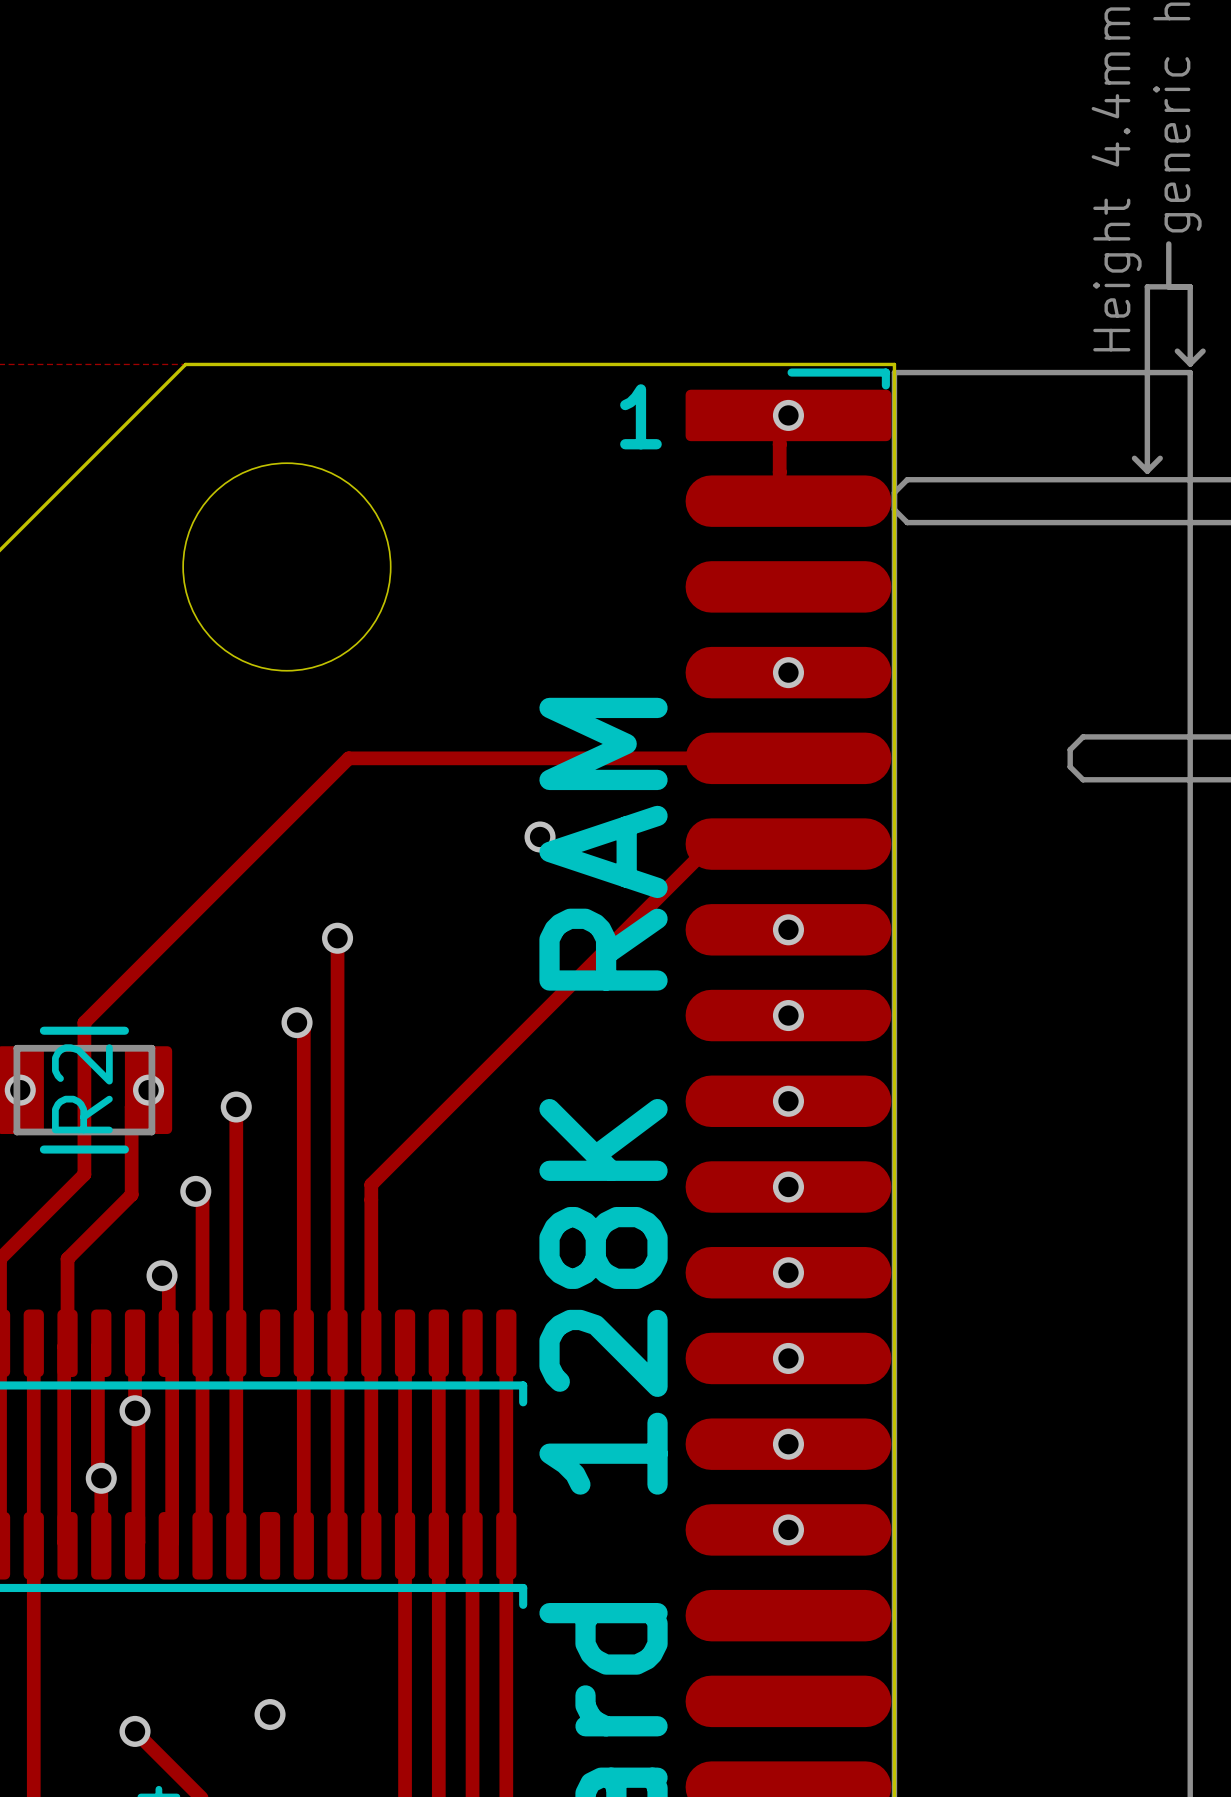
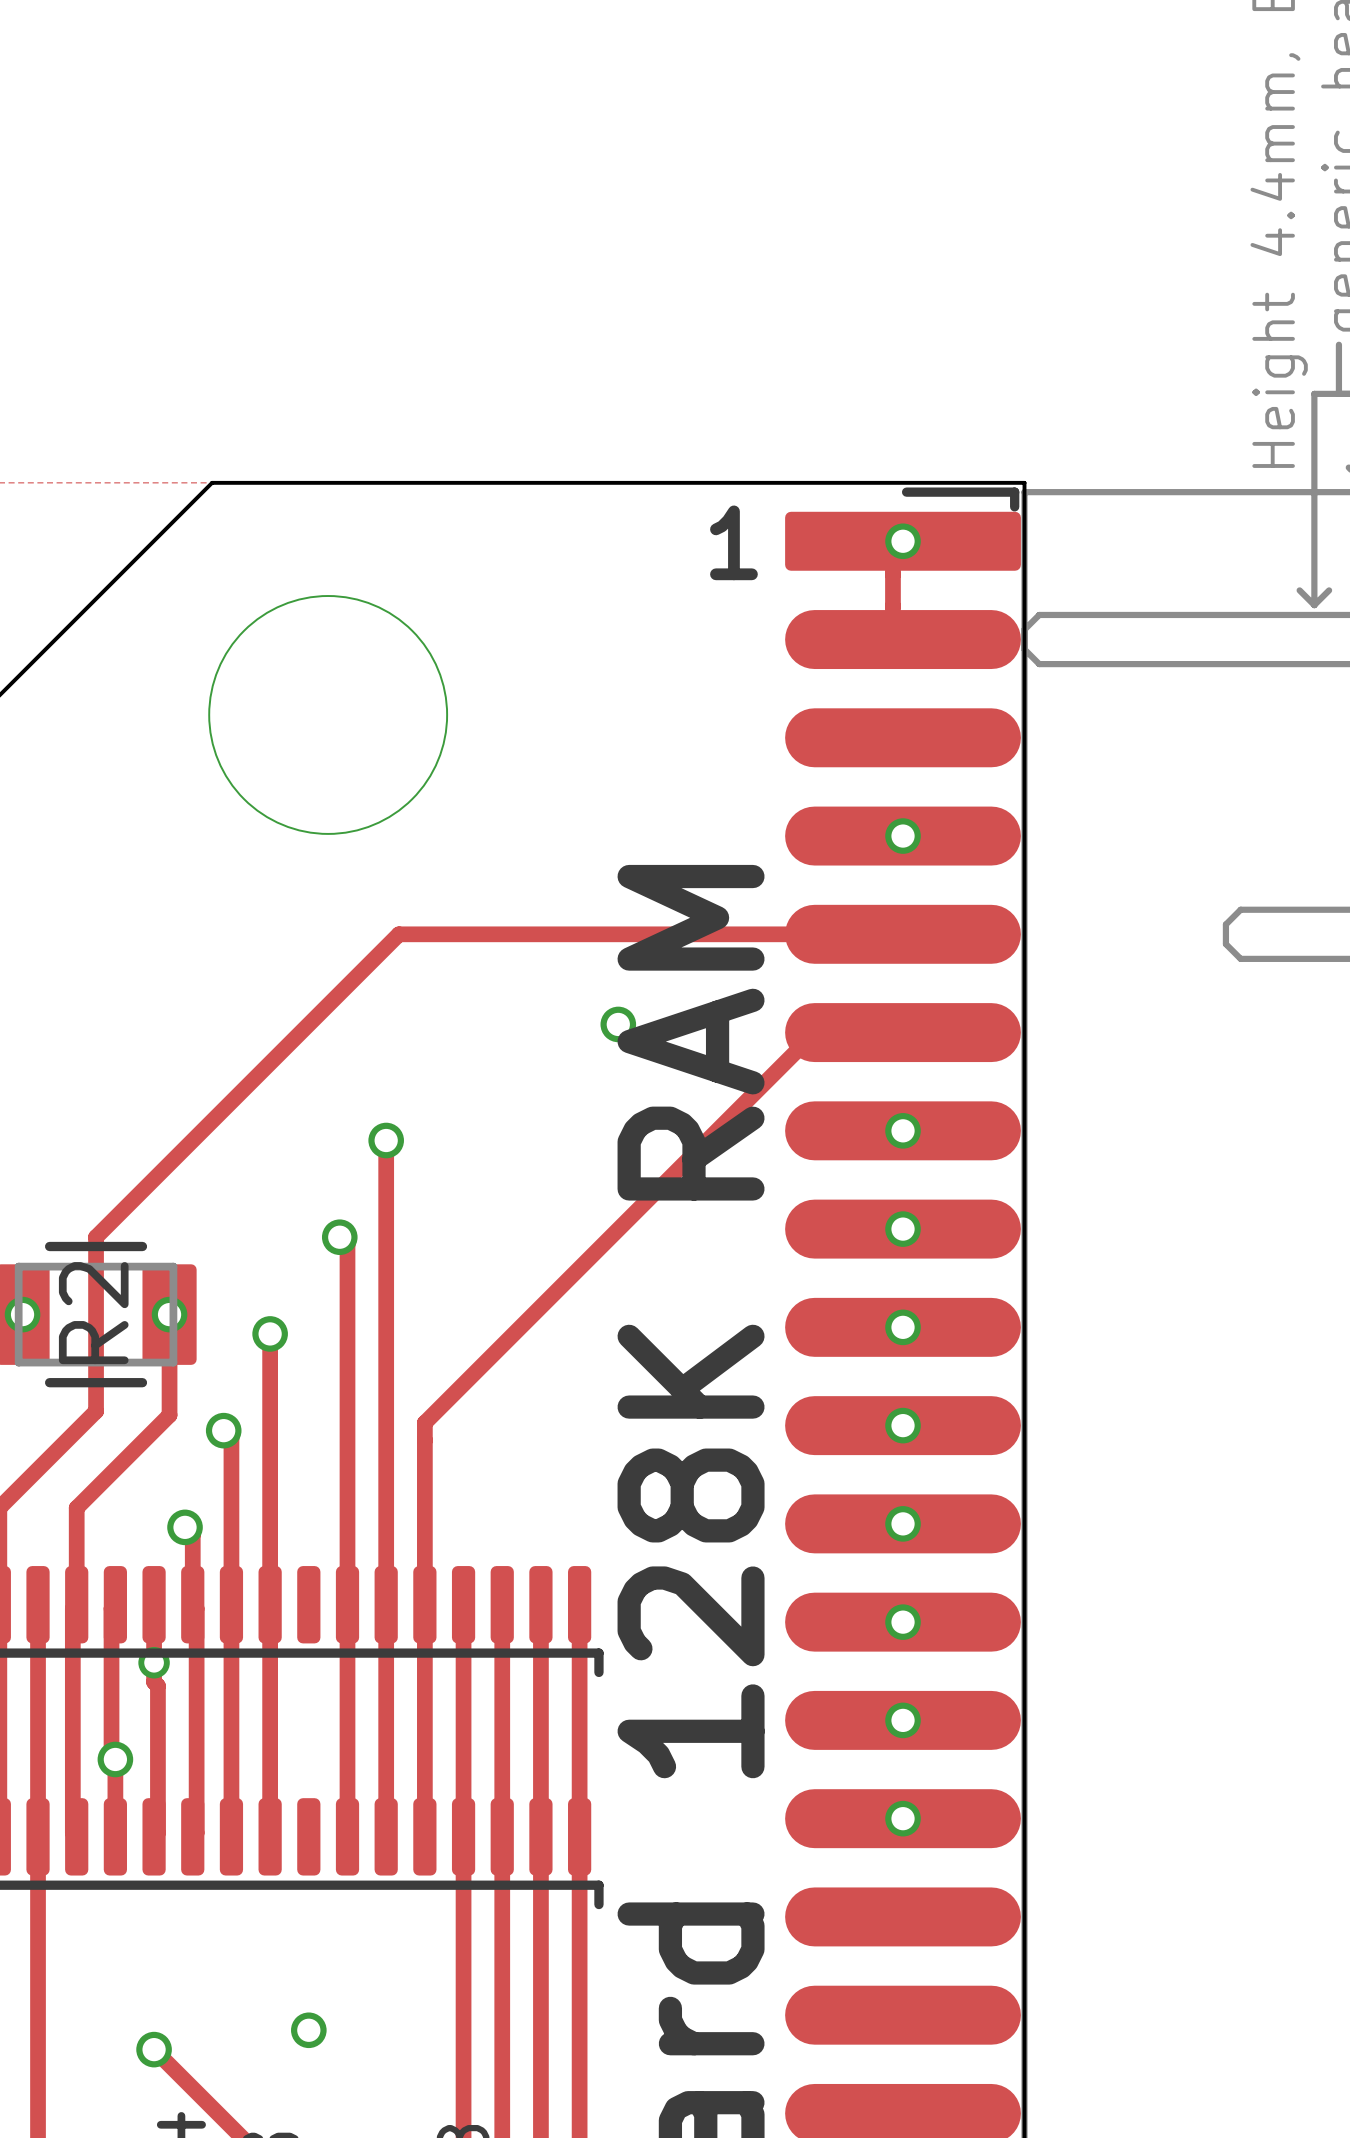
track: (148, 1090) (131, 1107) (131, 1194) -> (169, 1314) (169, 1415) (150, 1434)
via position: (135, 1410) -> (154, 1662)

